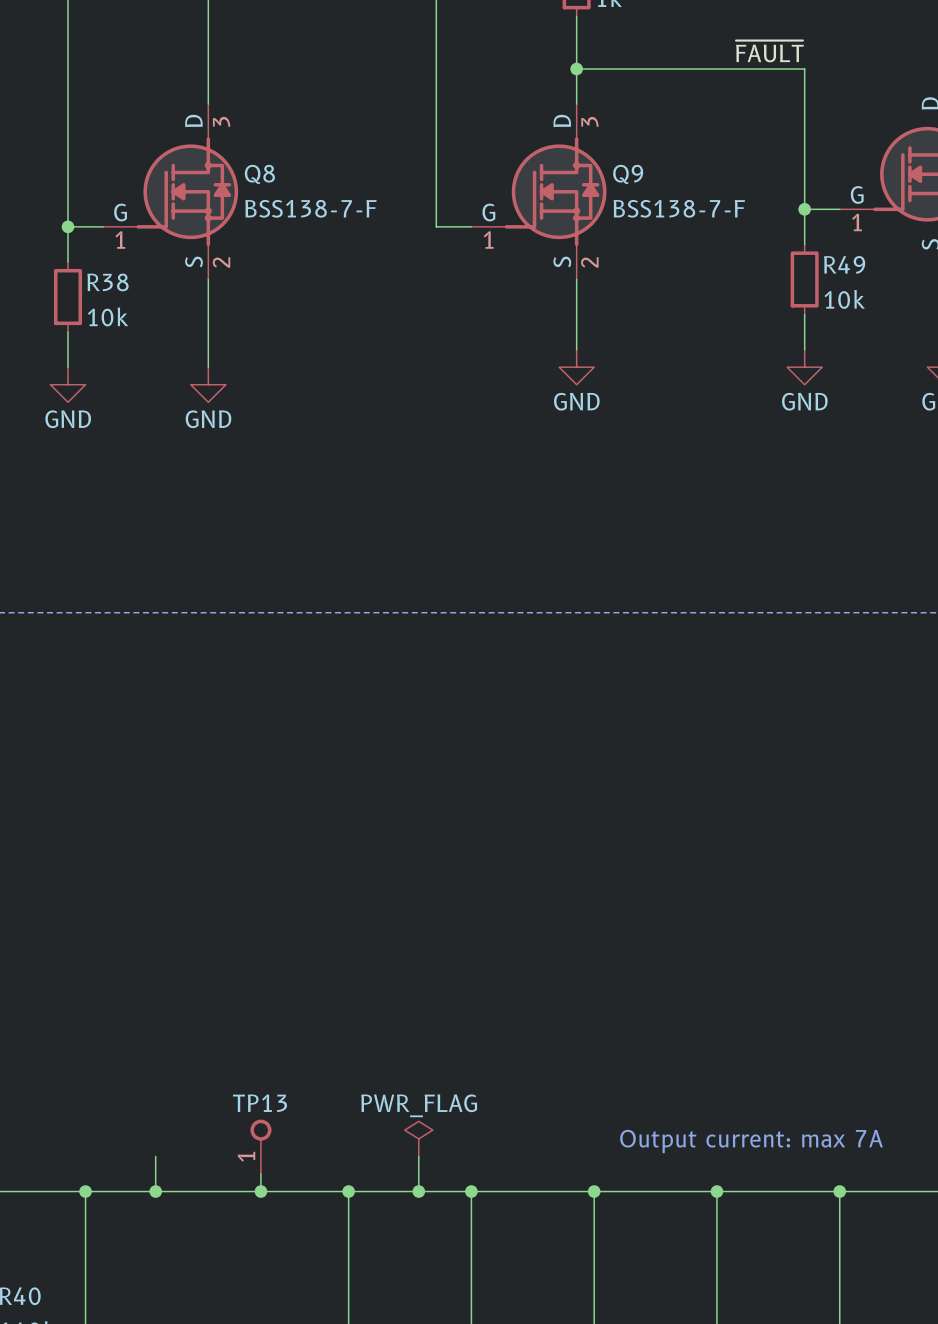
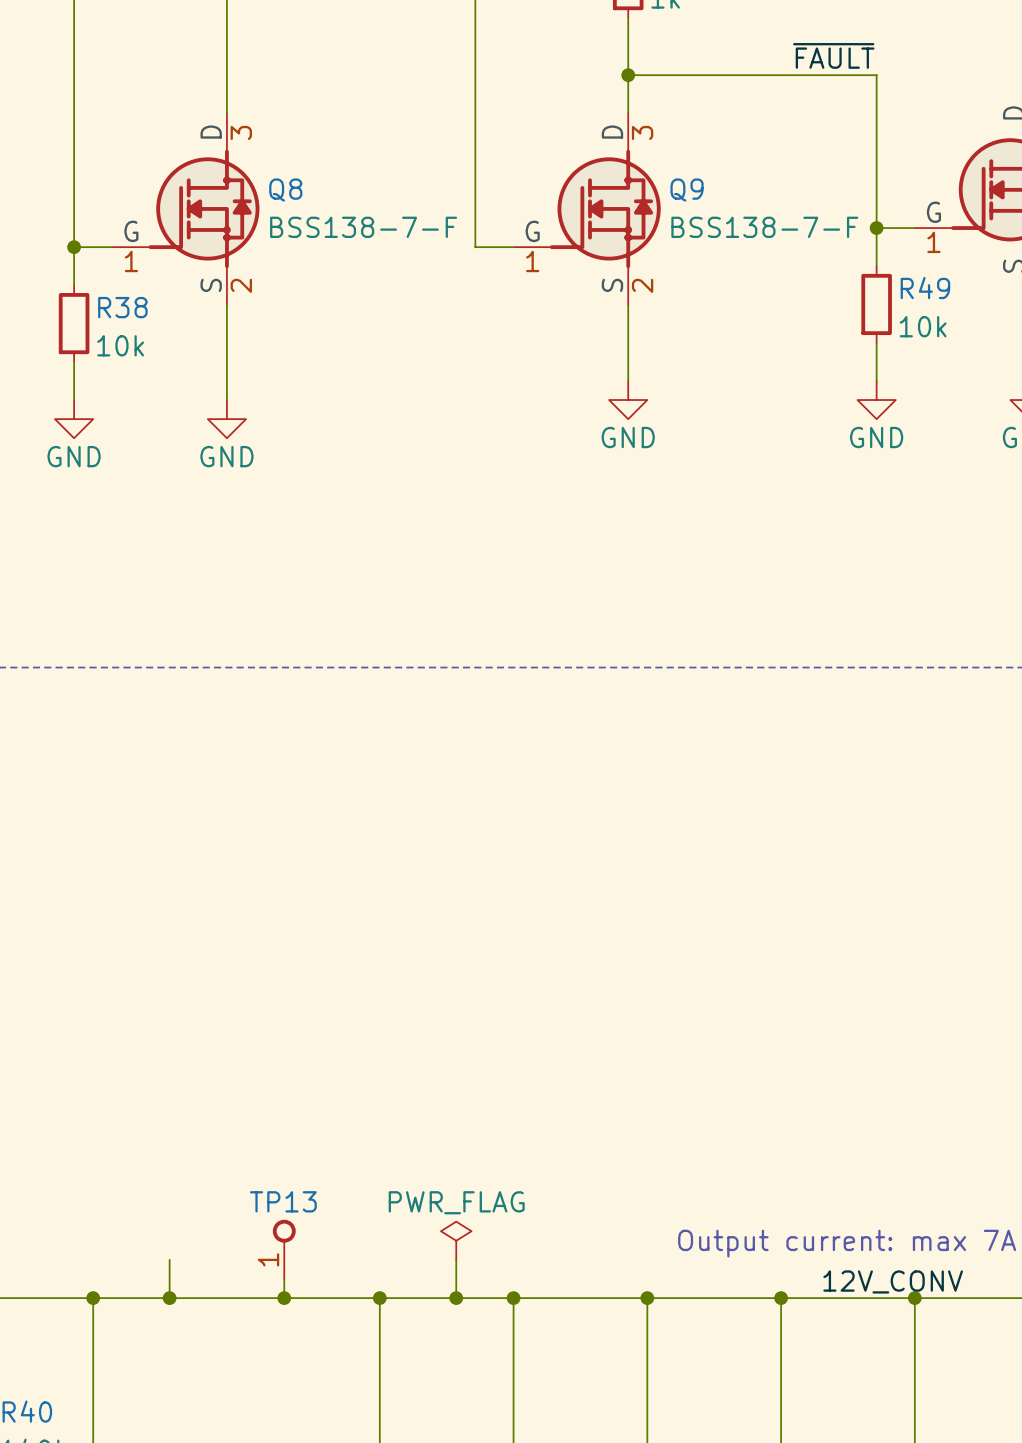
label: none -> 12V_CONV (893, 1281)

